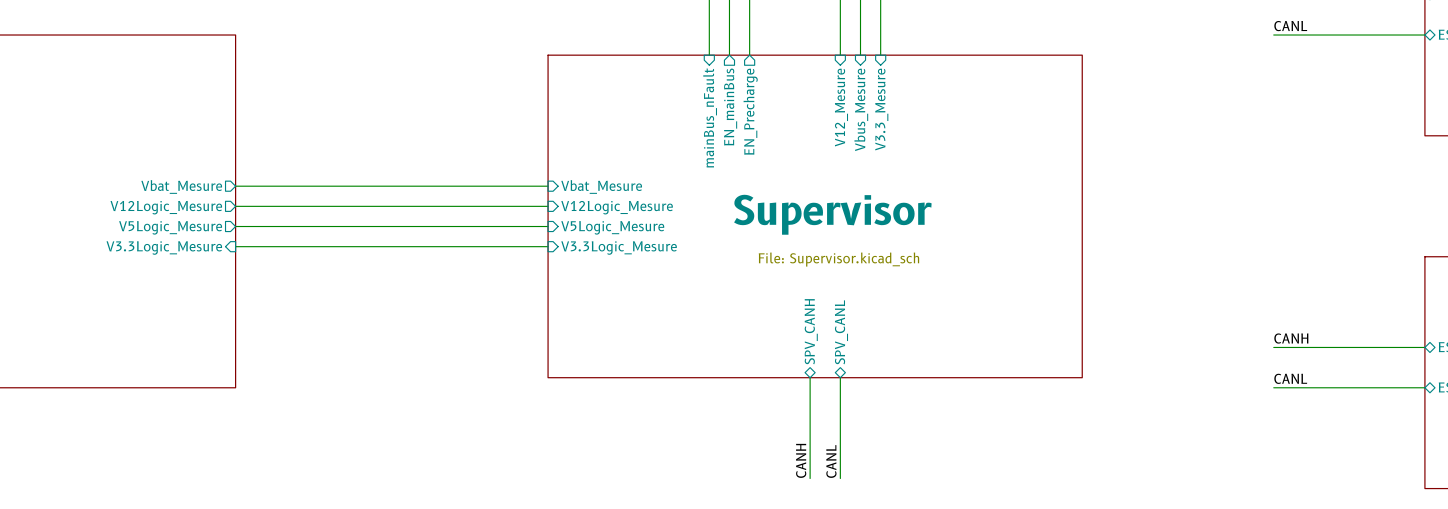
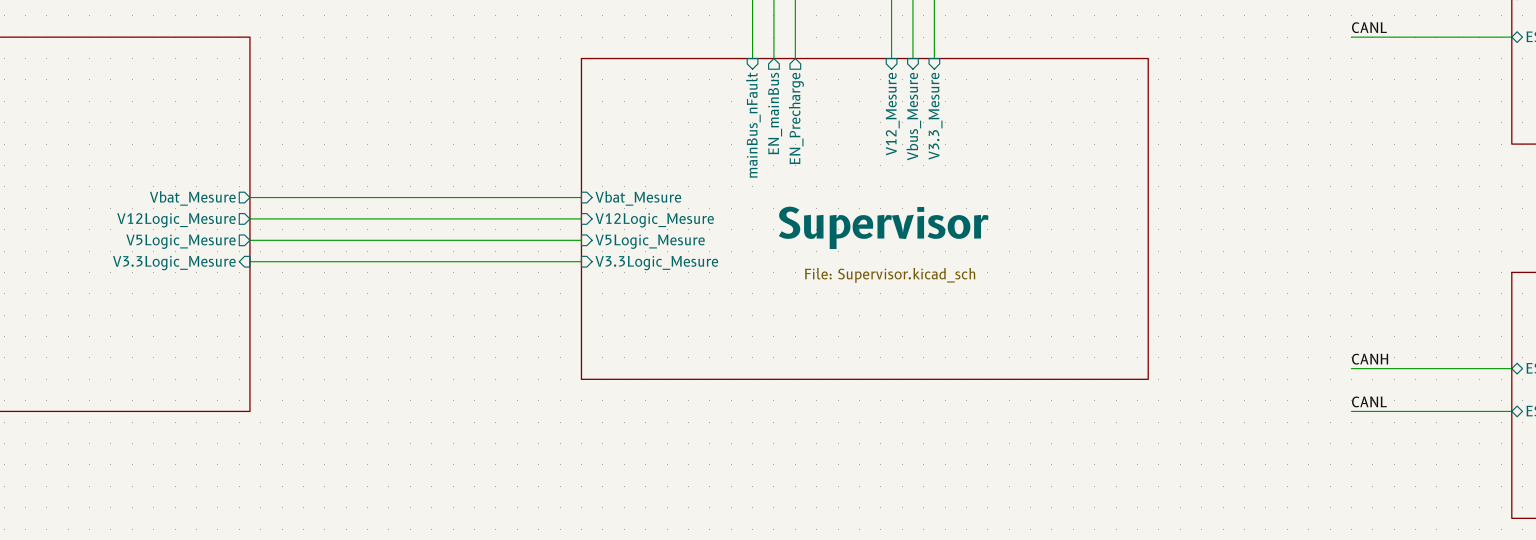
sheet Supervisor: none -> File: Supervisor.kicad_sch (864, 218)
sheet Supervisor: File: Supervisor.kicad_sch (815, 216) -> none
sheet pin: SPV_CANH (811, 331) -> none
sheet pin: SPV_CANL (841, 332) -> none
wire: (810, 377) (810, 478) -> none
wire: (840, 377) (840, 478) -> none
label: CANH (801, 460) -> none
label: CANL (831, 461) -> none

